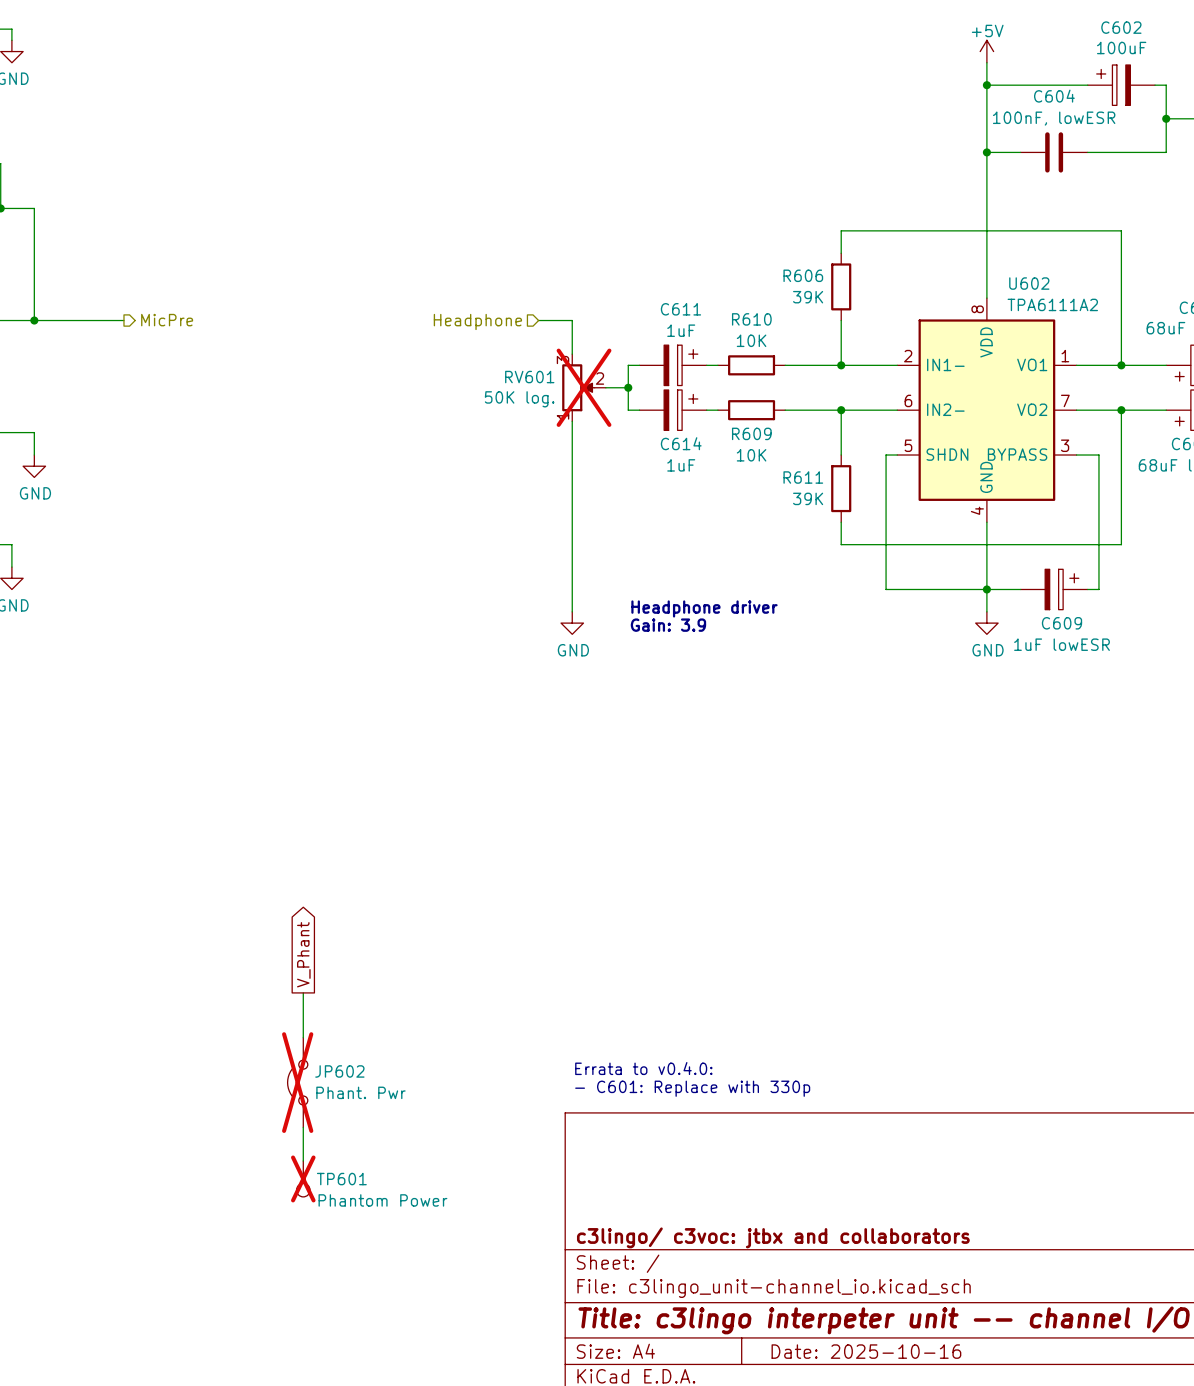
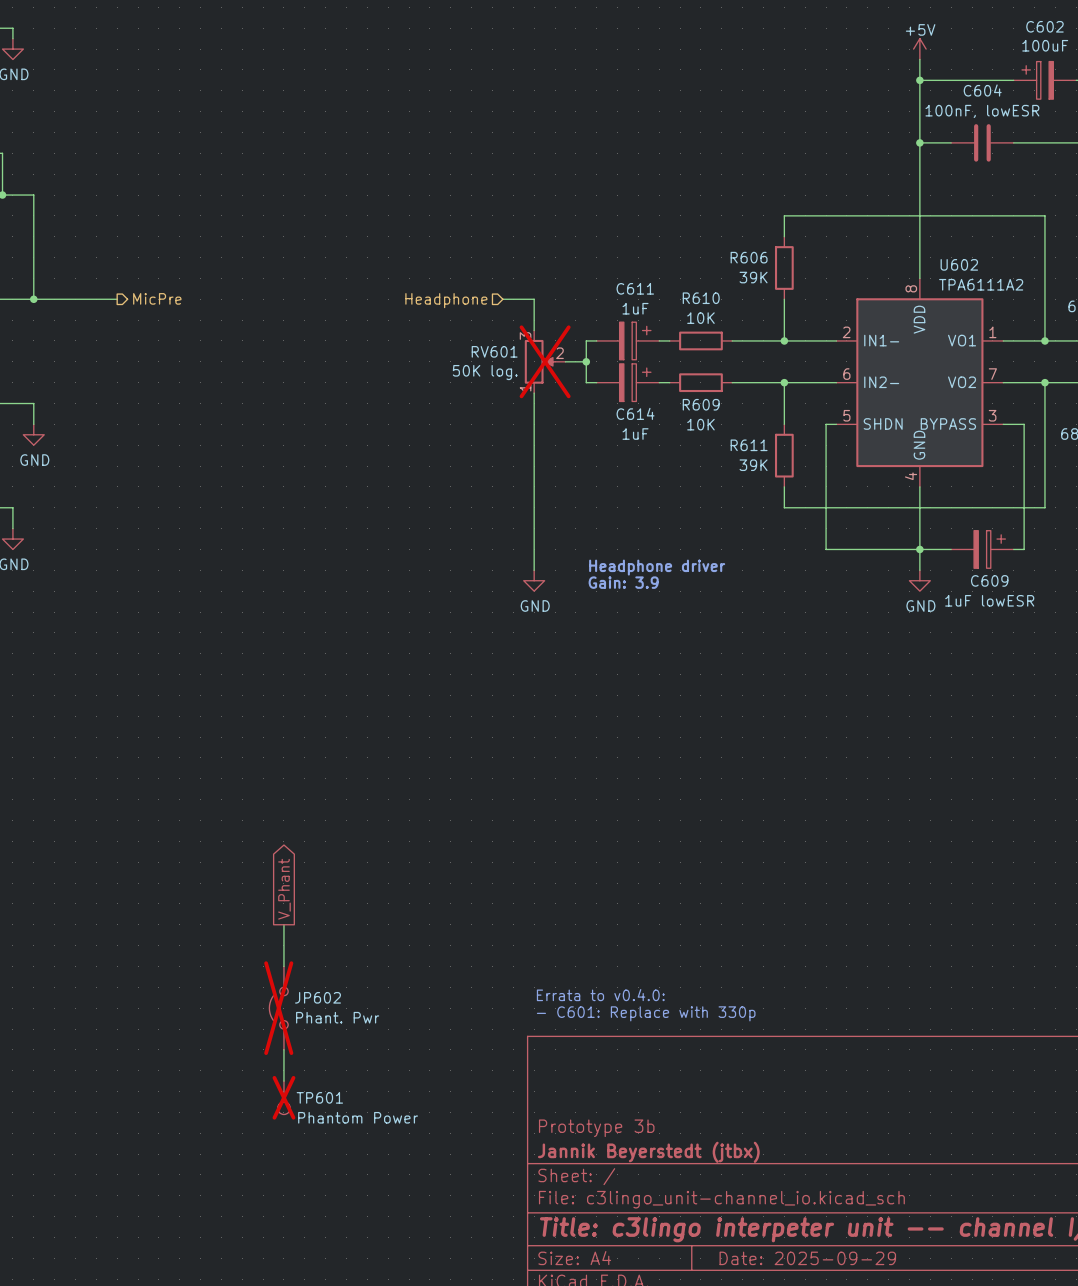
title block: none -> Prototype 3b (596, 1128)
title block: c3lingo/ c3voc: jtbx and collaborators (773, 1237) -> Jannik Beyerstedt (jtbx) (648, 1152)
title block: Date: 2025-10-16 (866, 1351) -> Date: 2025-09-29 (807, 1258)

